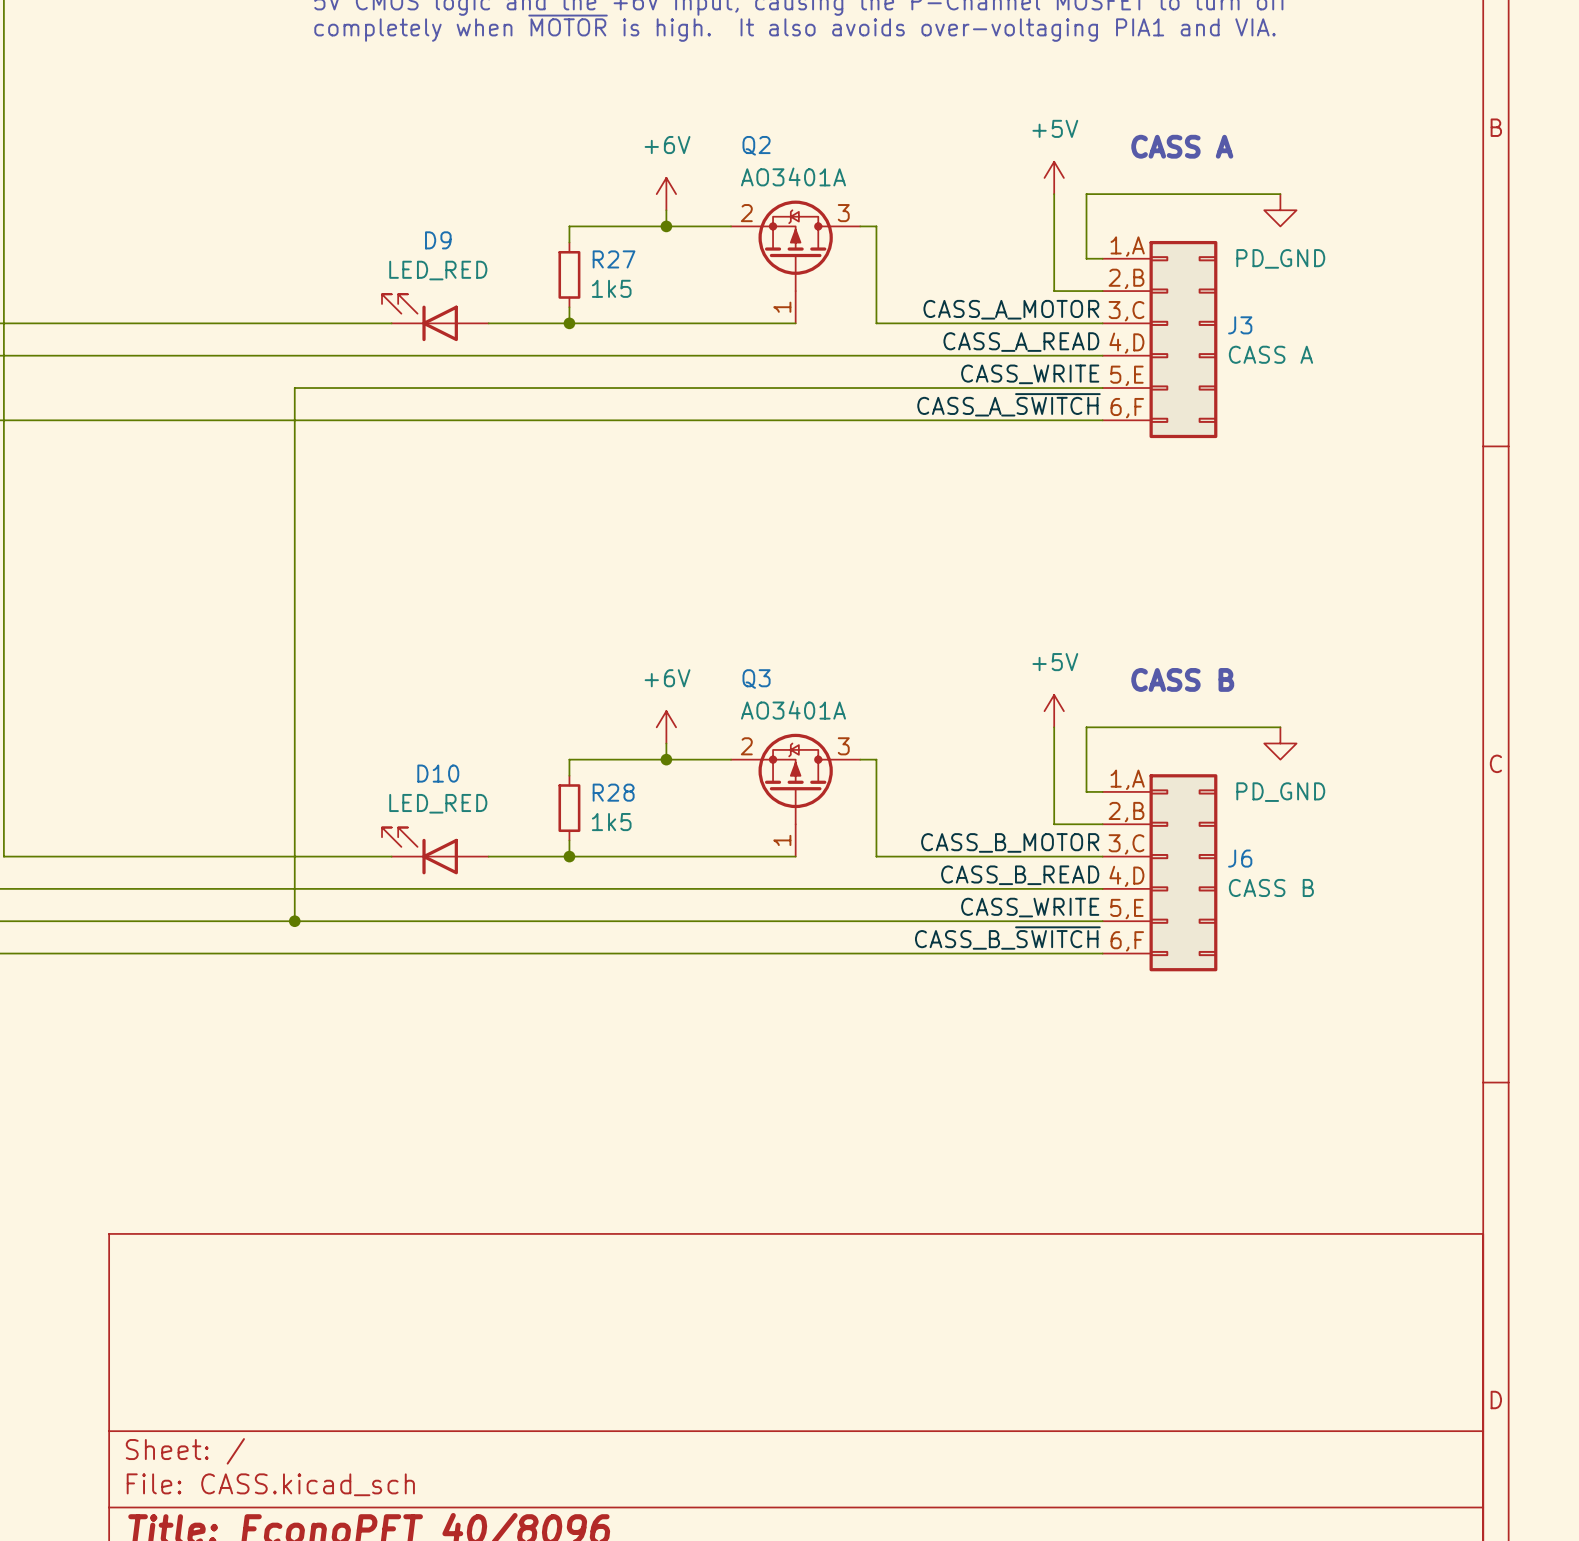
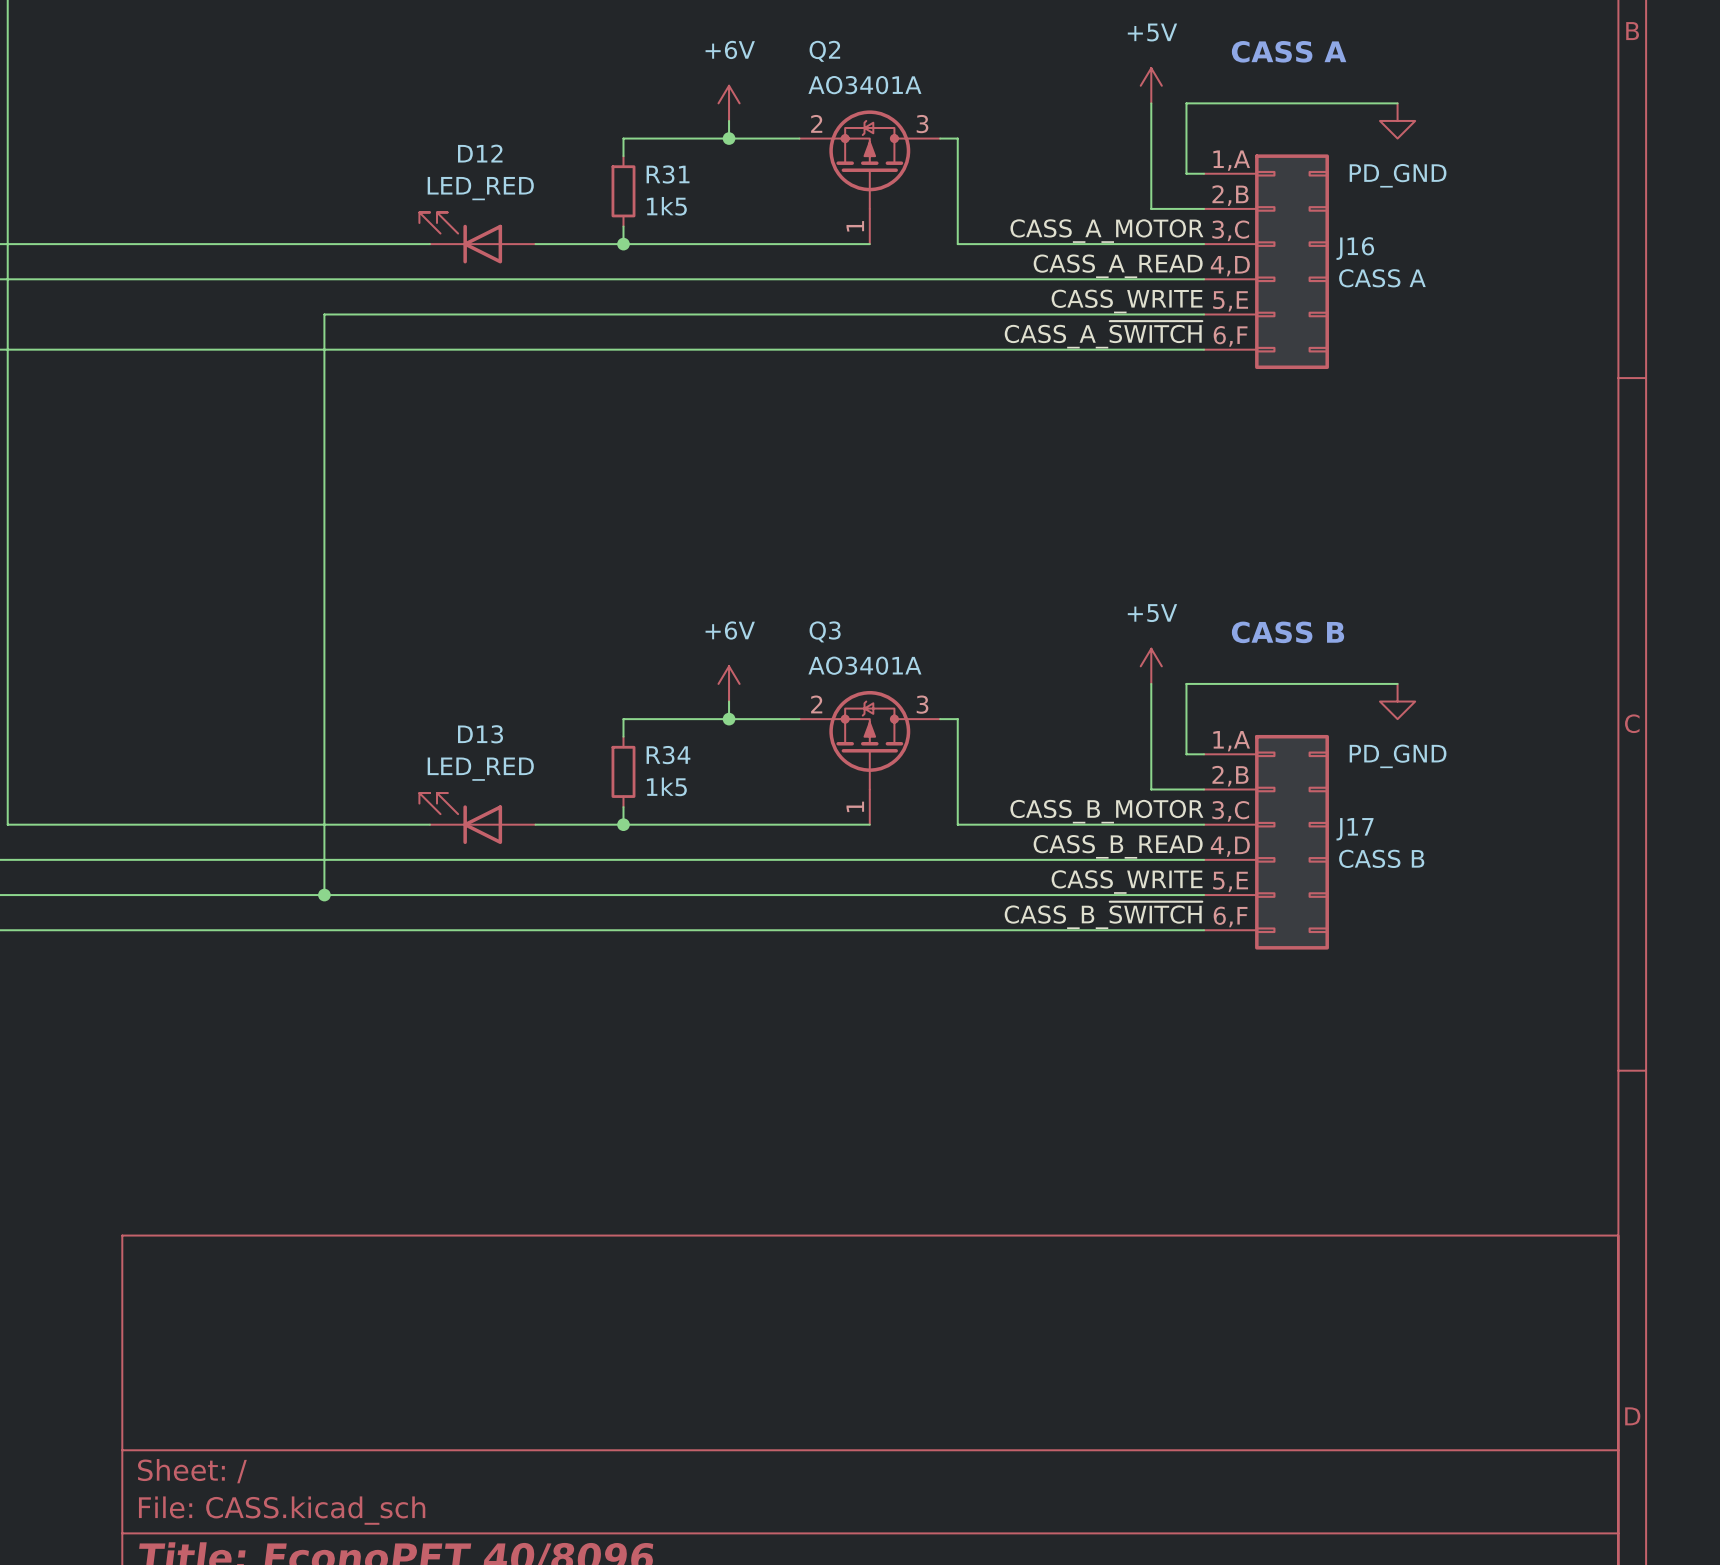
D9 name: D9 (438, 240) -> D12 (480, 153)
R27 name: R27 (614, 259) -> R31 (668, 174)
J3 name: J3 (1240, 325) -> J16 (1355, 248)
D10 name: D10 (438, 773) -> D13 (480, 734)
R28 name: R28 (613, 792) -> R34 (668, 755)
J6 name: J6 (1240, 858) -> J17 (1355, 829)

